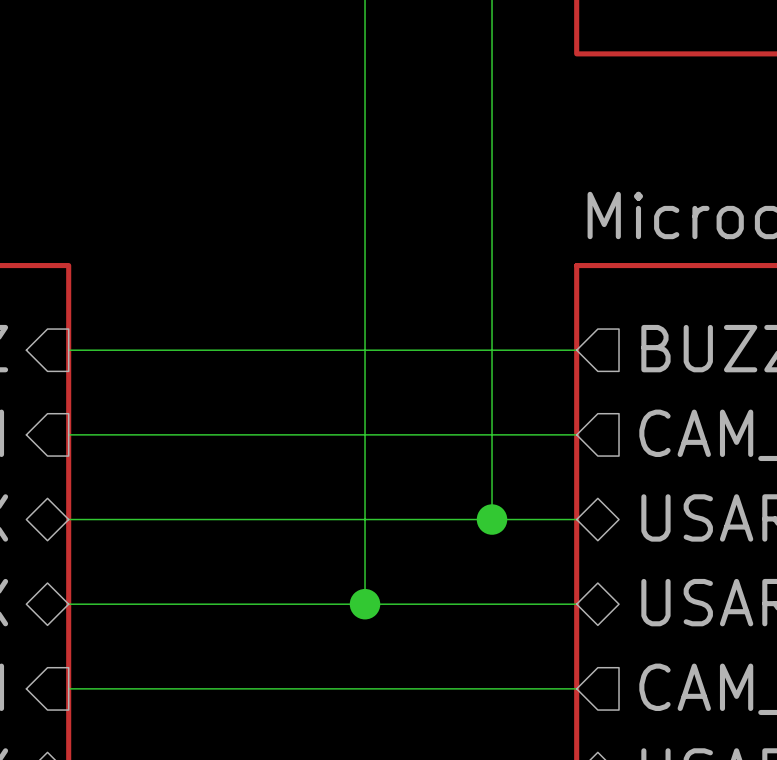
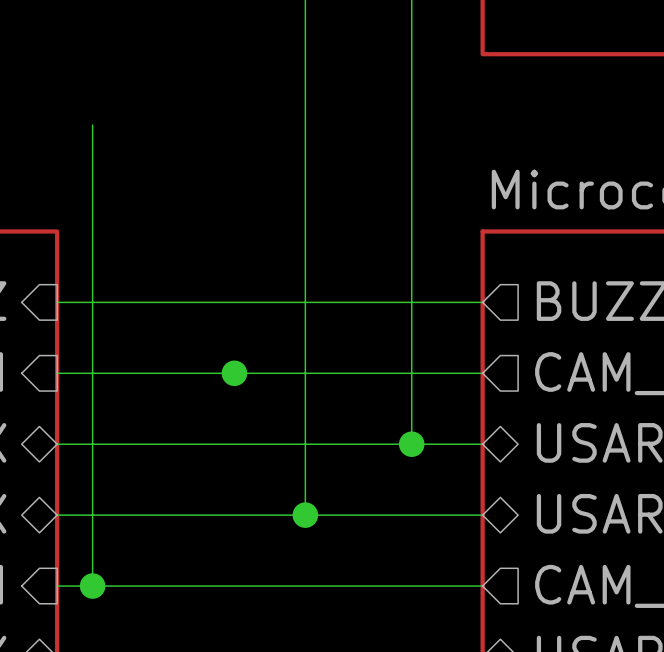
wire: none -> (92, 125) (92, 586)
junction: none -> (234, 373)
junction: none -> (92, 586)

